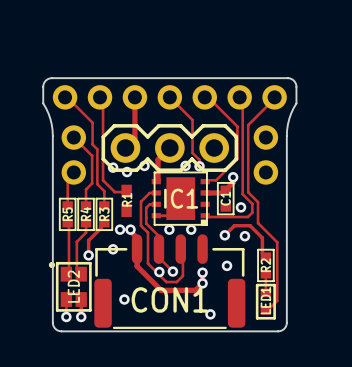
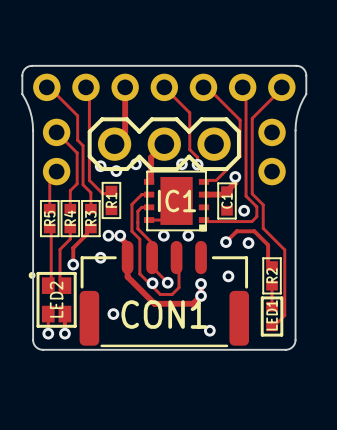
R1 footprint: [121, 184, 132, 217] -> [101, 181, 122, 220]

